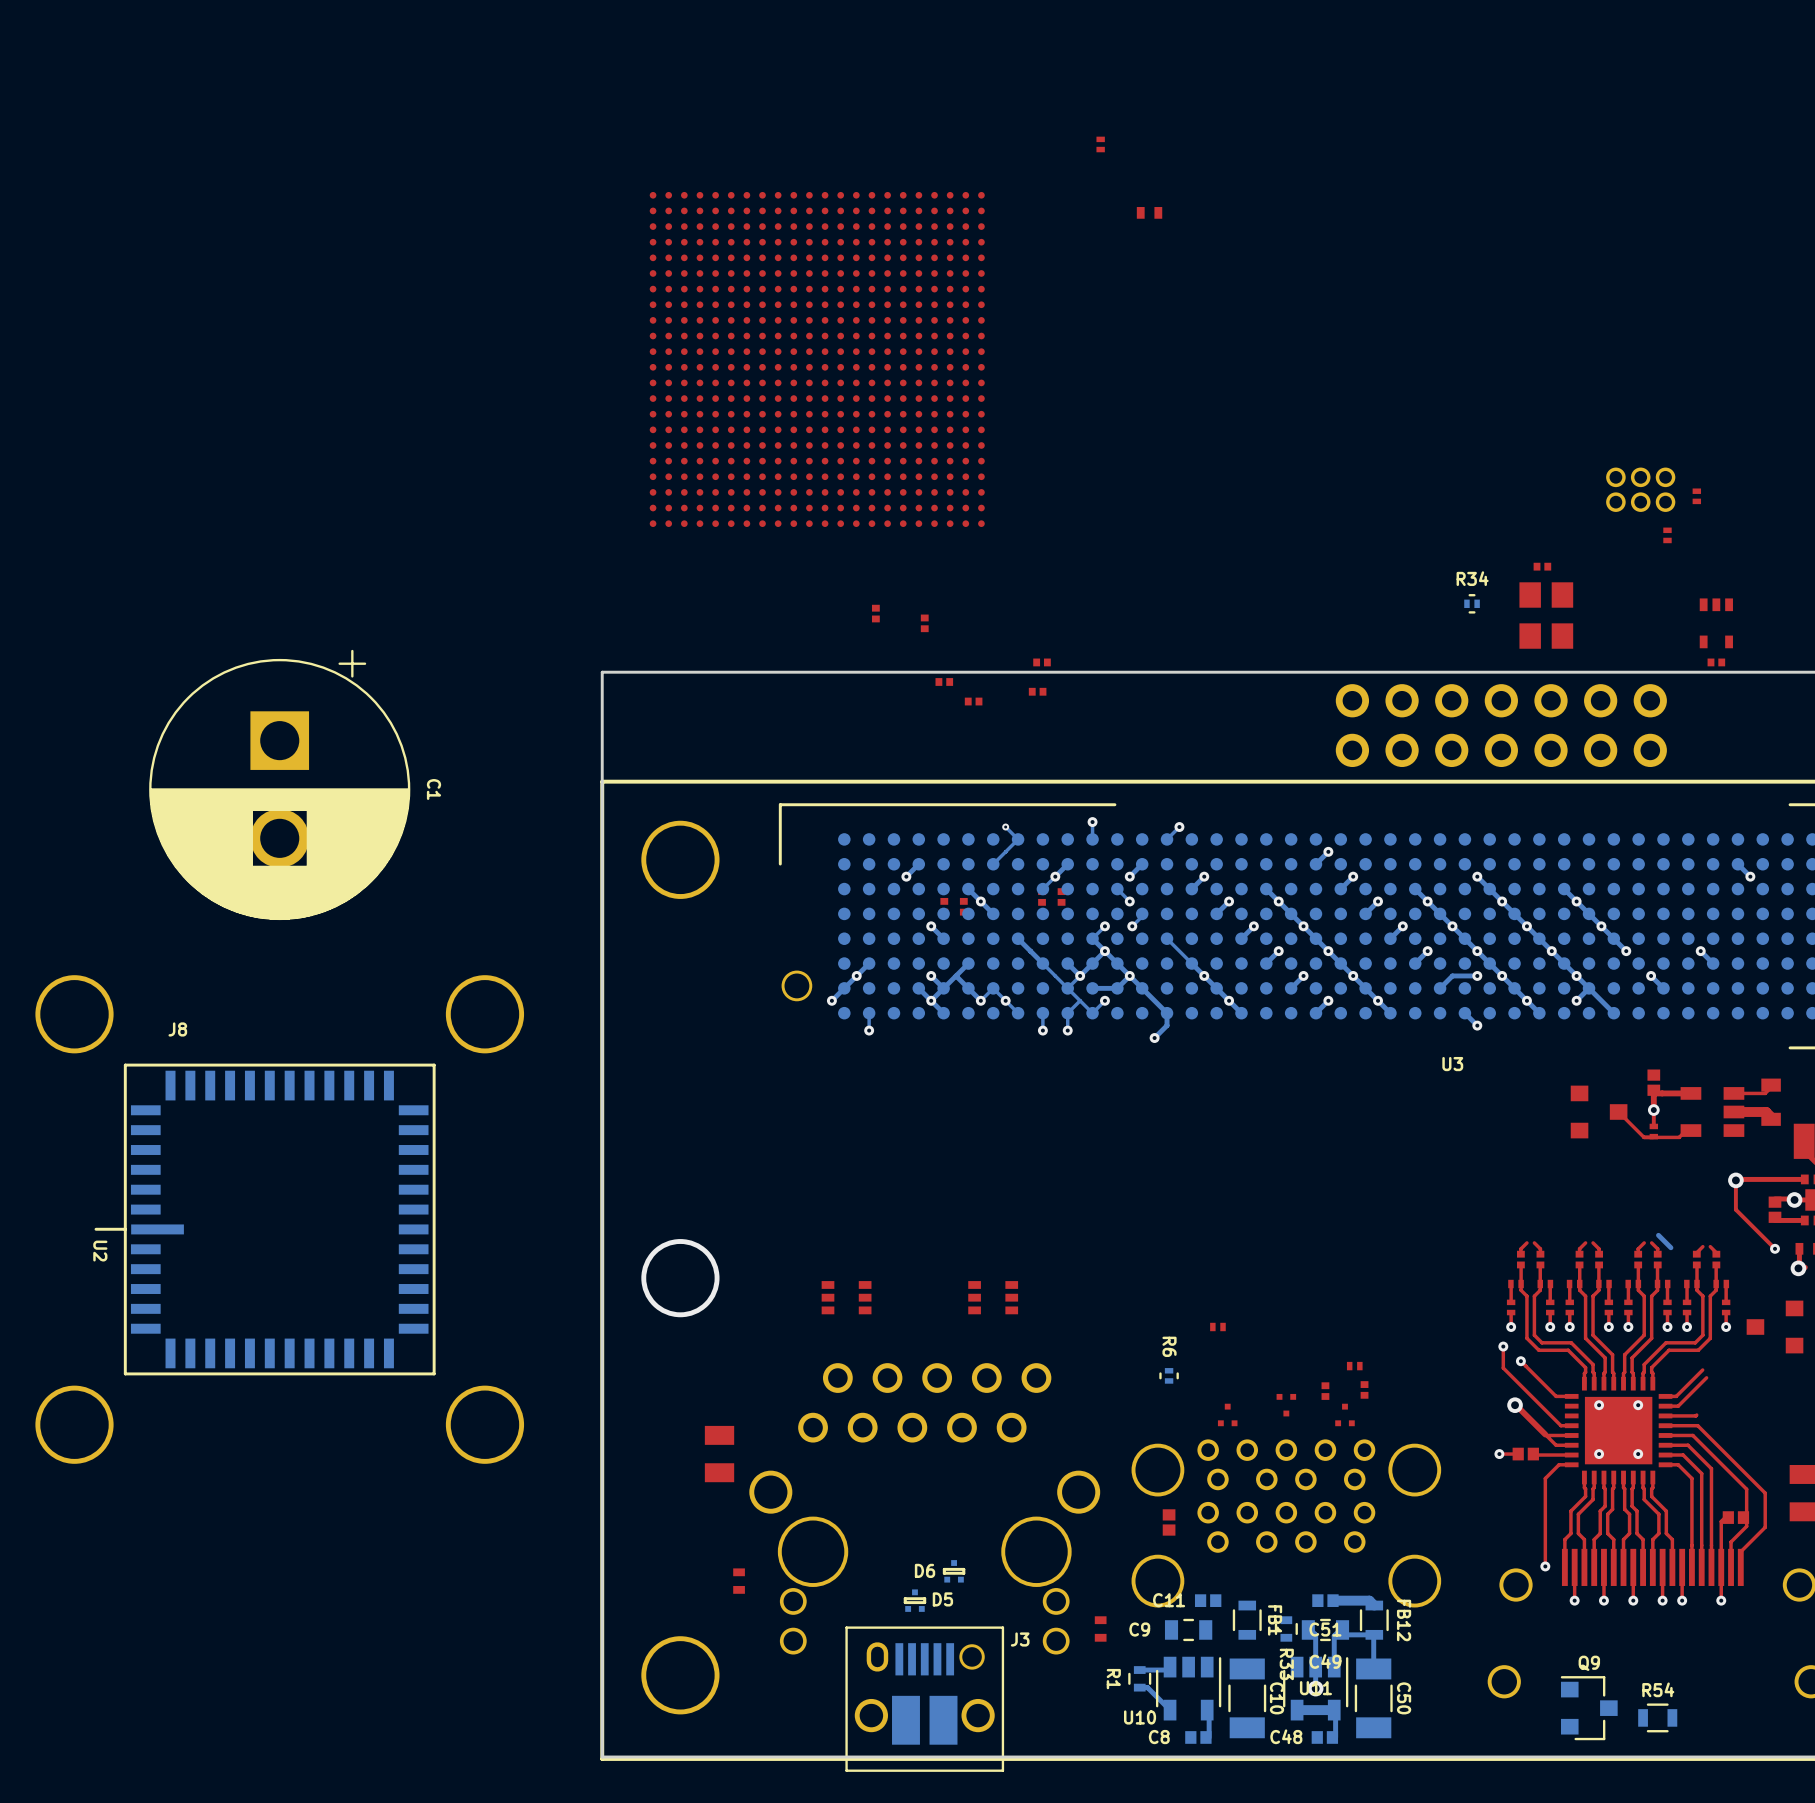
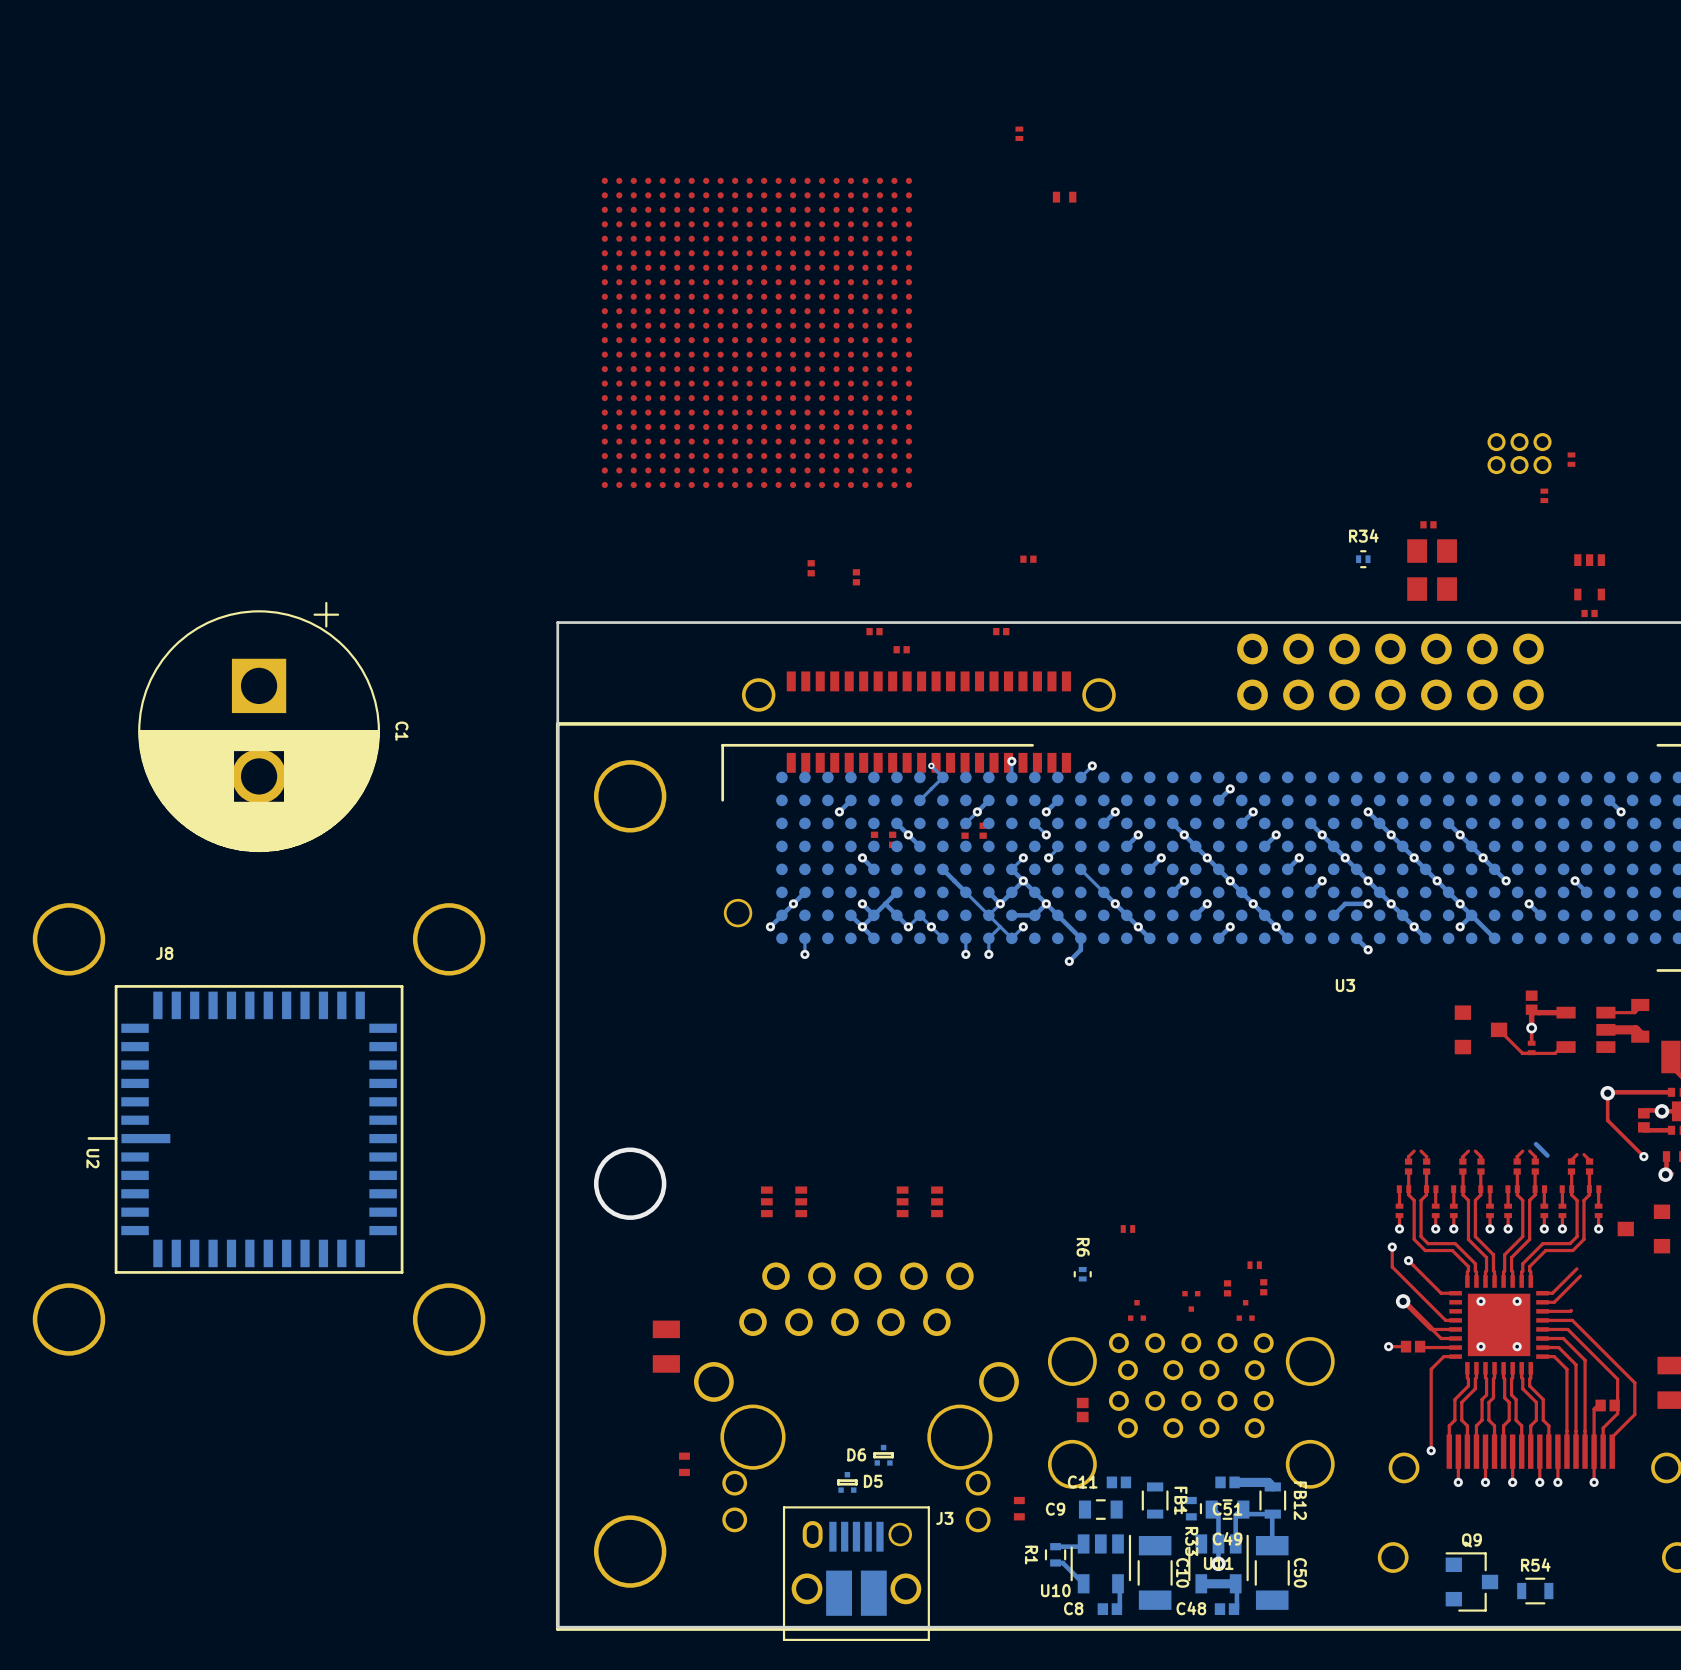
part: none -> (1028, 559)
part: (1042, 662) -> none
part: none -> (1001, 631)
part: (1037, 691) -> none
part: none -> (928, 722)

